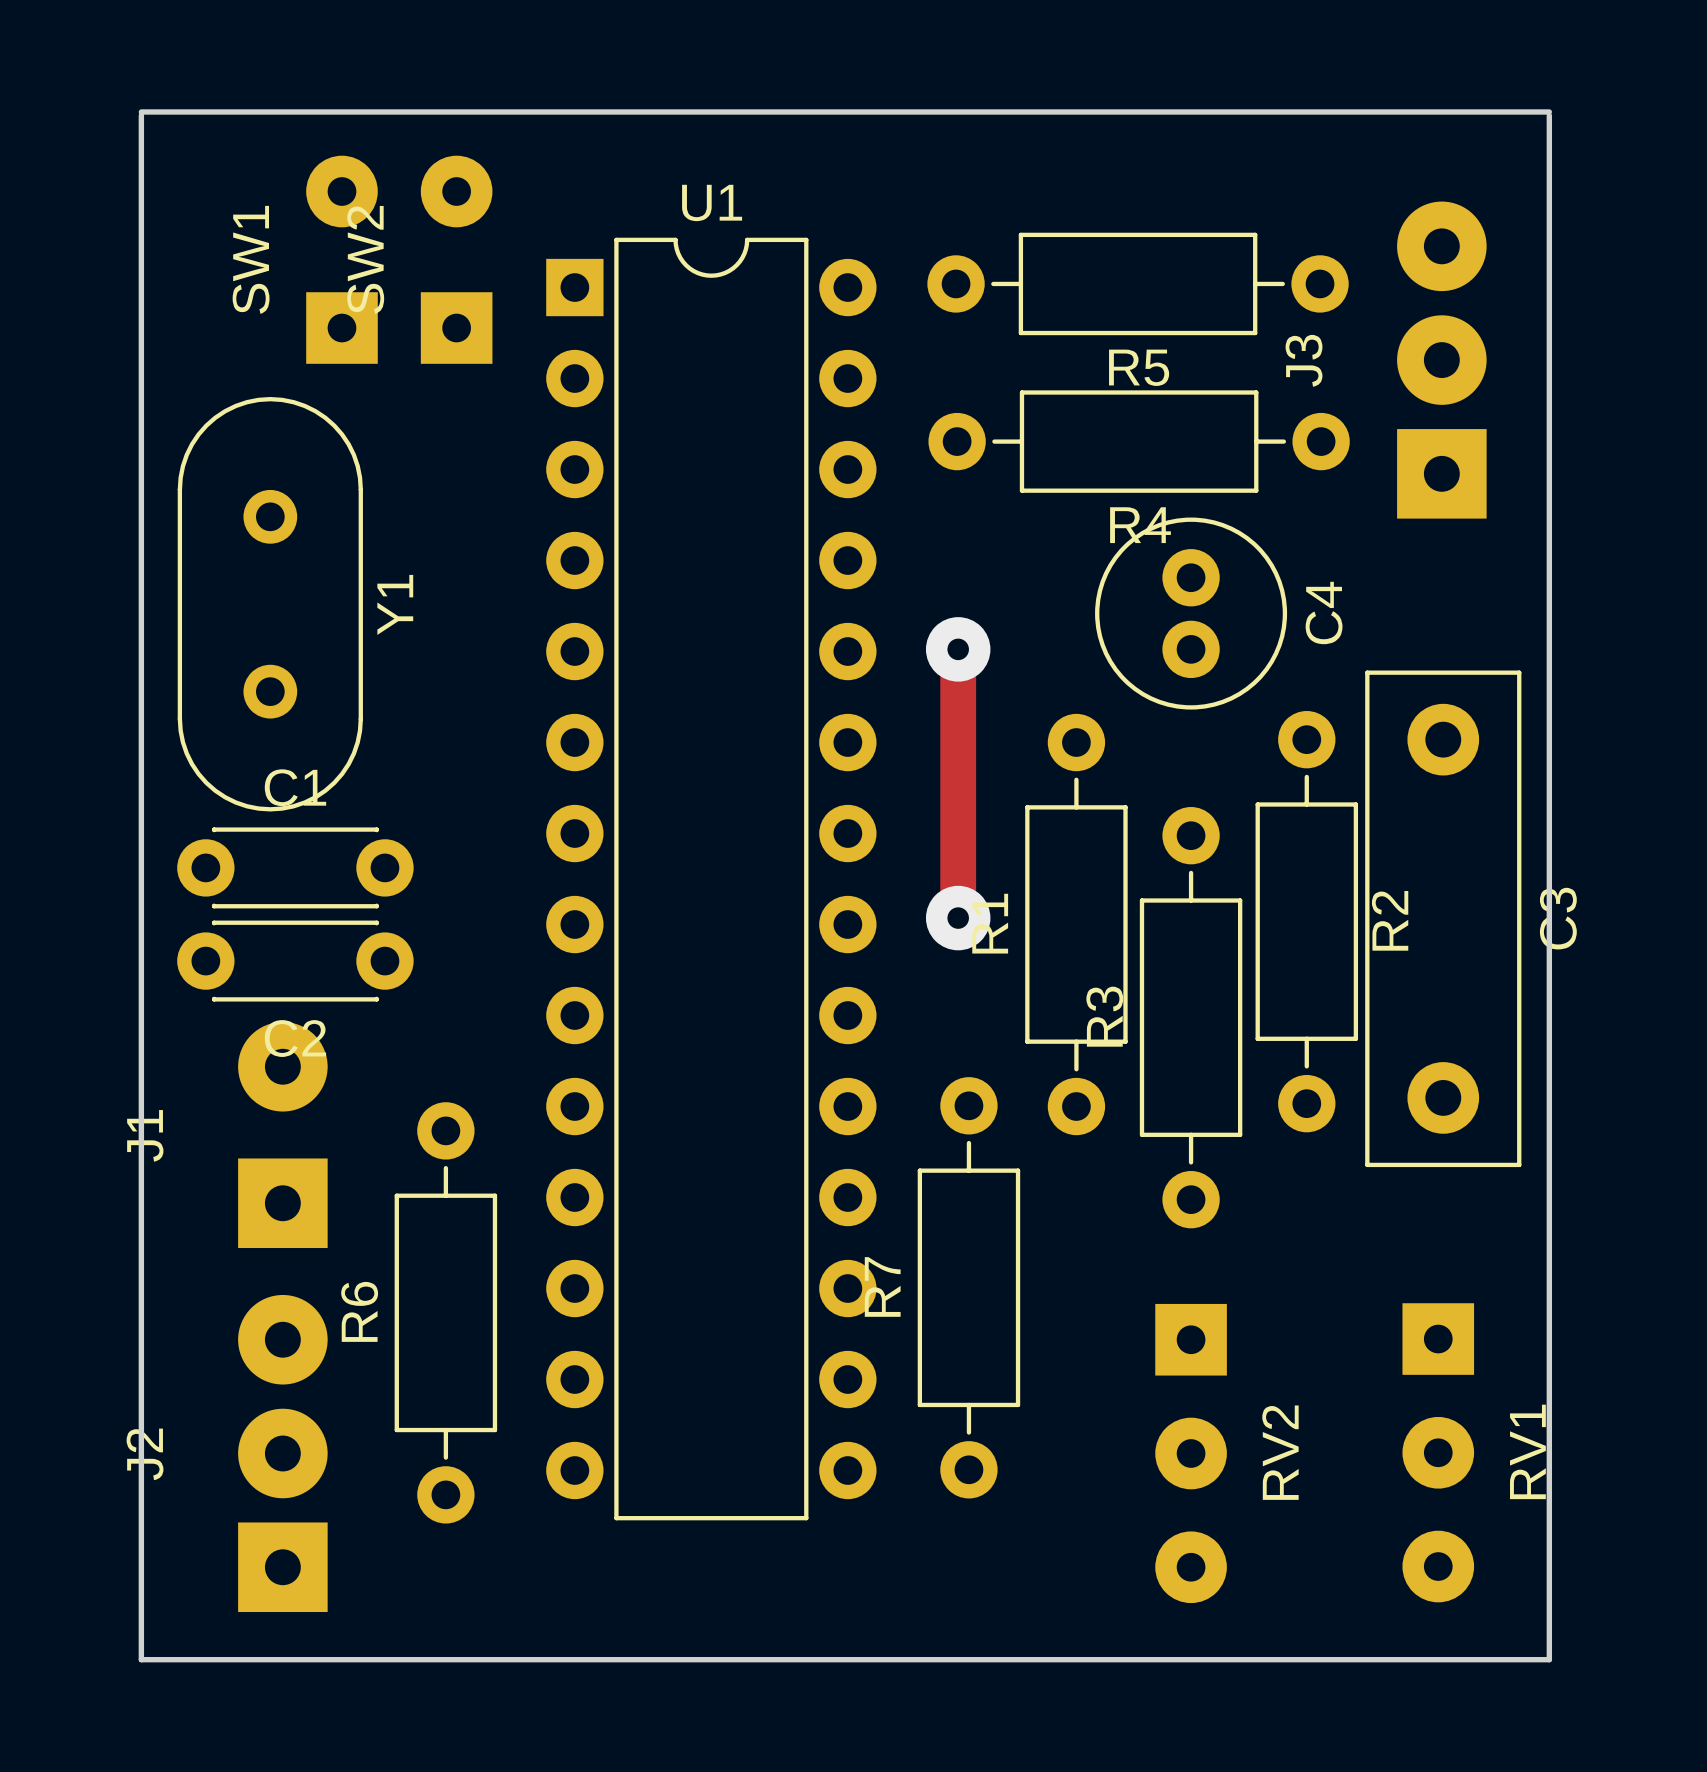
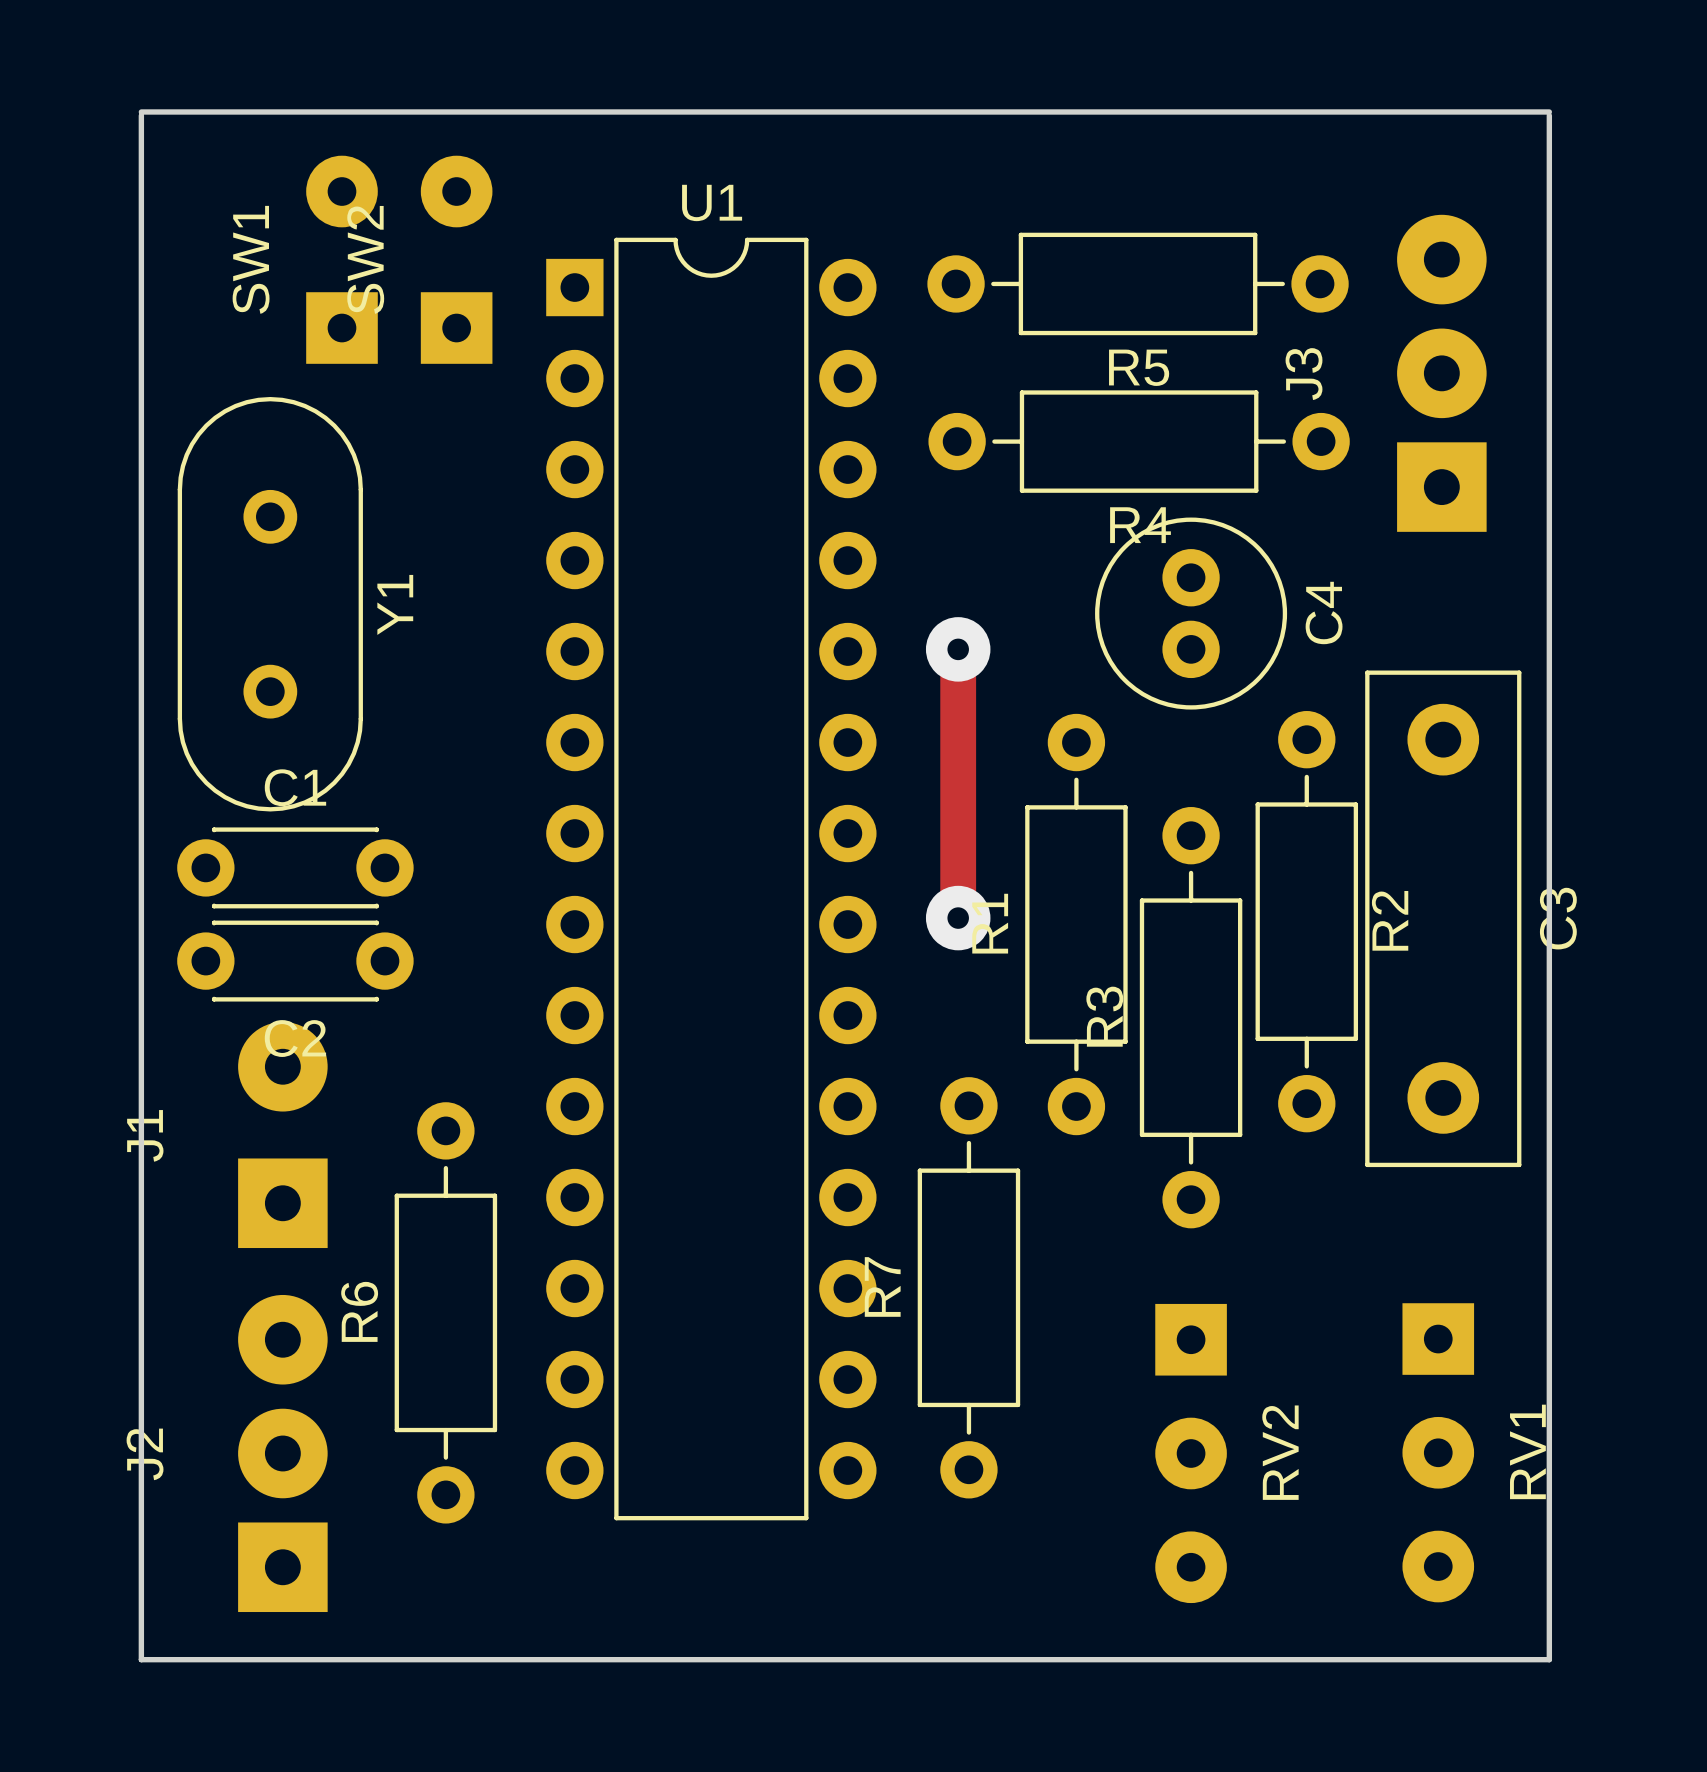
J3 position: (1441, 360) -> (1441, 373)

